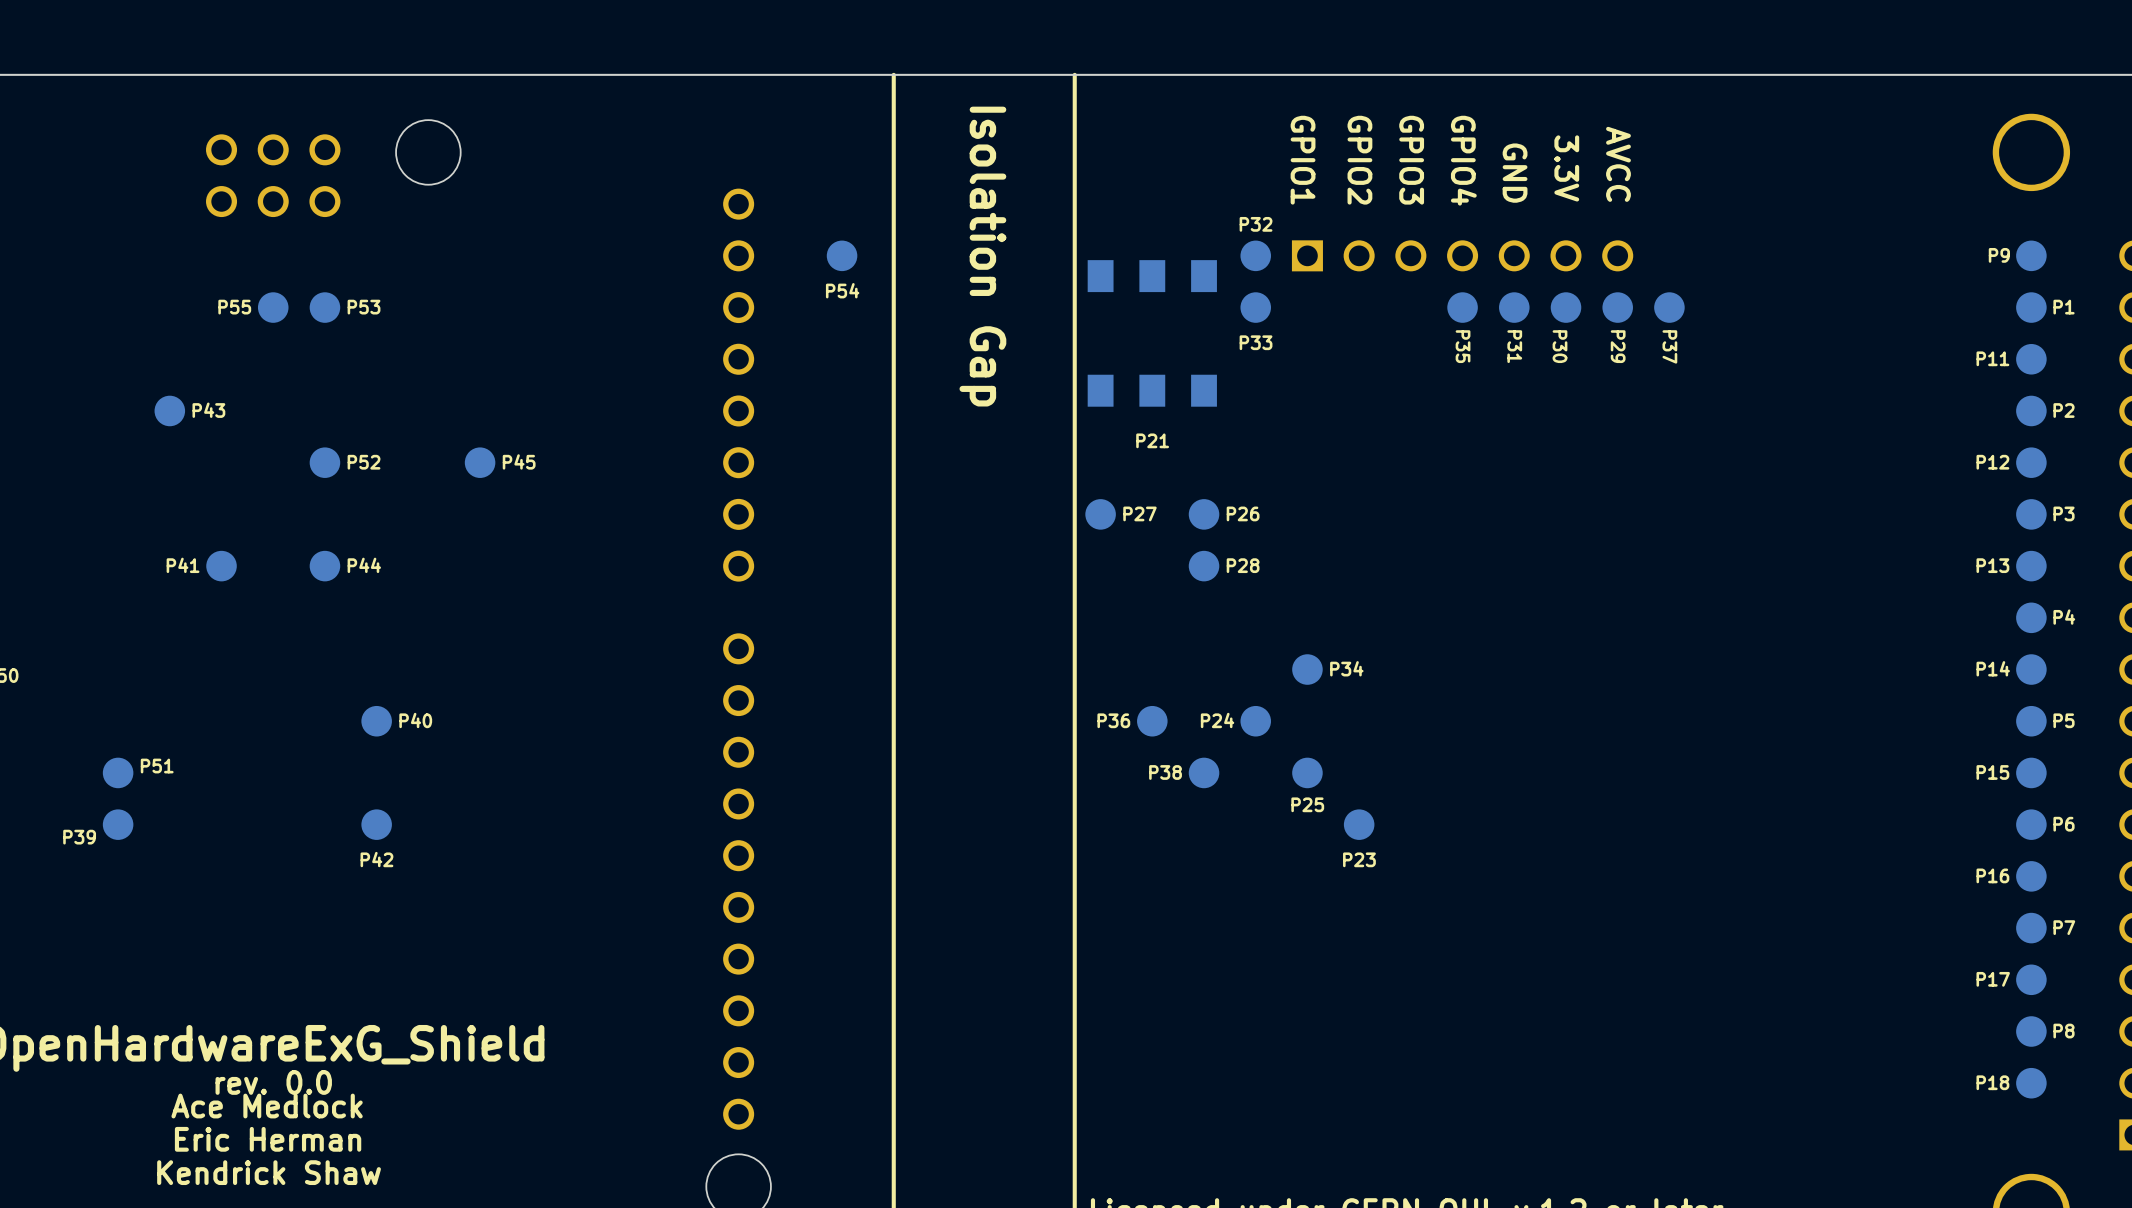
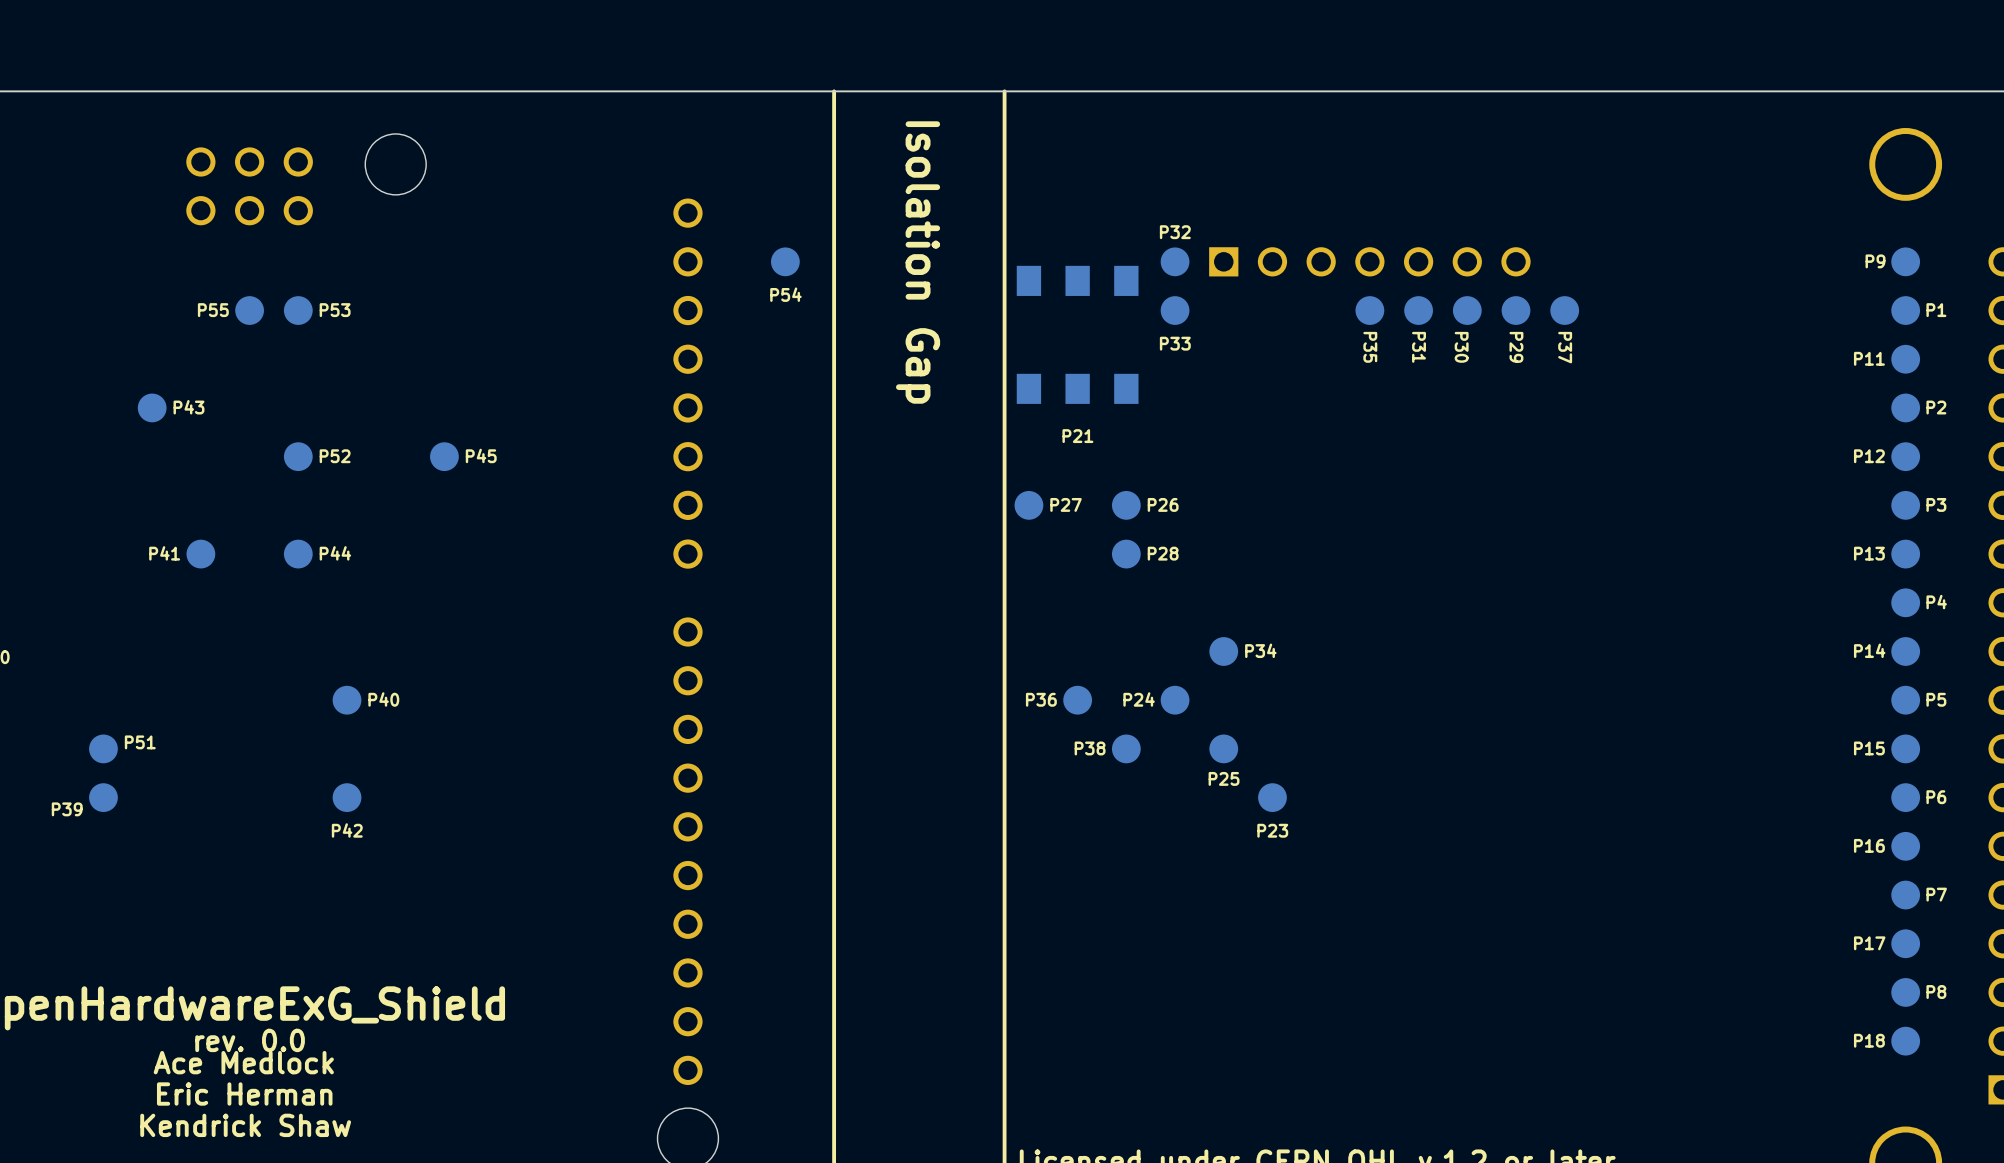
text: GPIO1 (1303, 160) -> none
text: GPIO2 (1359, 160) -> none
text: GPIO3 (1411, 160) -> none
text: GPIO4 (1463, 160) -> none
text: AVCC (1618, 164) -> none
text: 3.3V (1566, 168) -> none
text: GND (1515, 173) -> none

